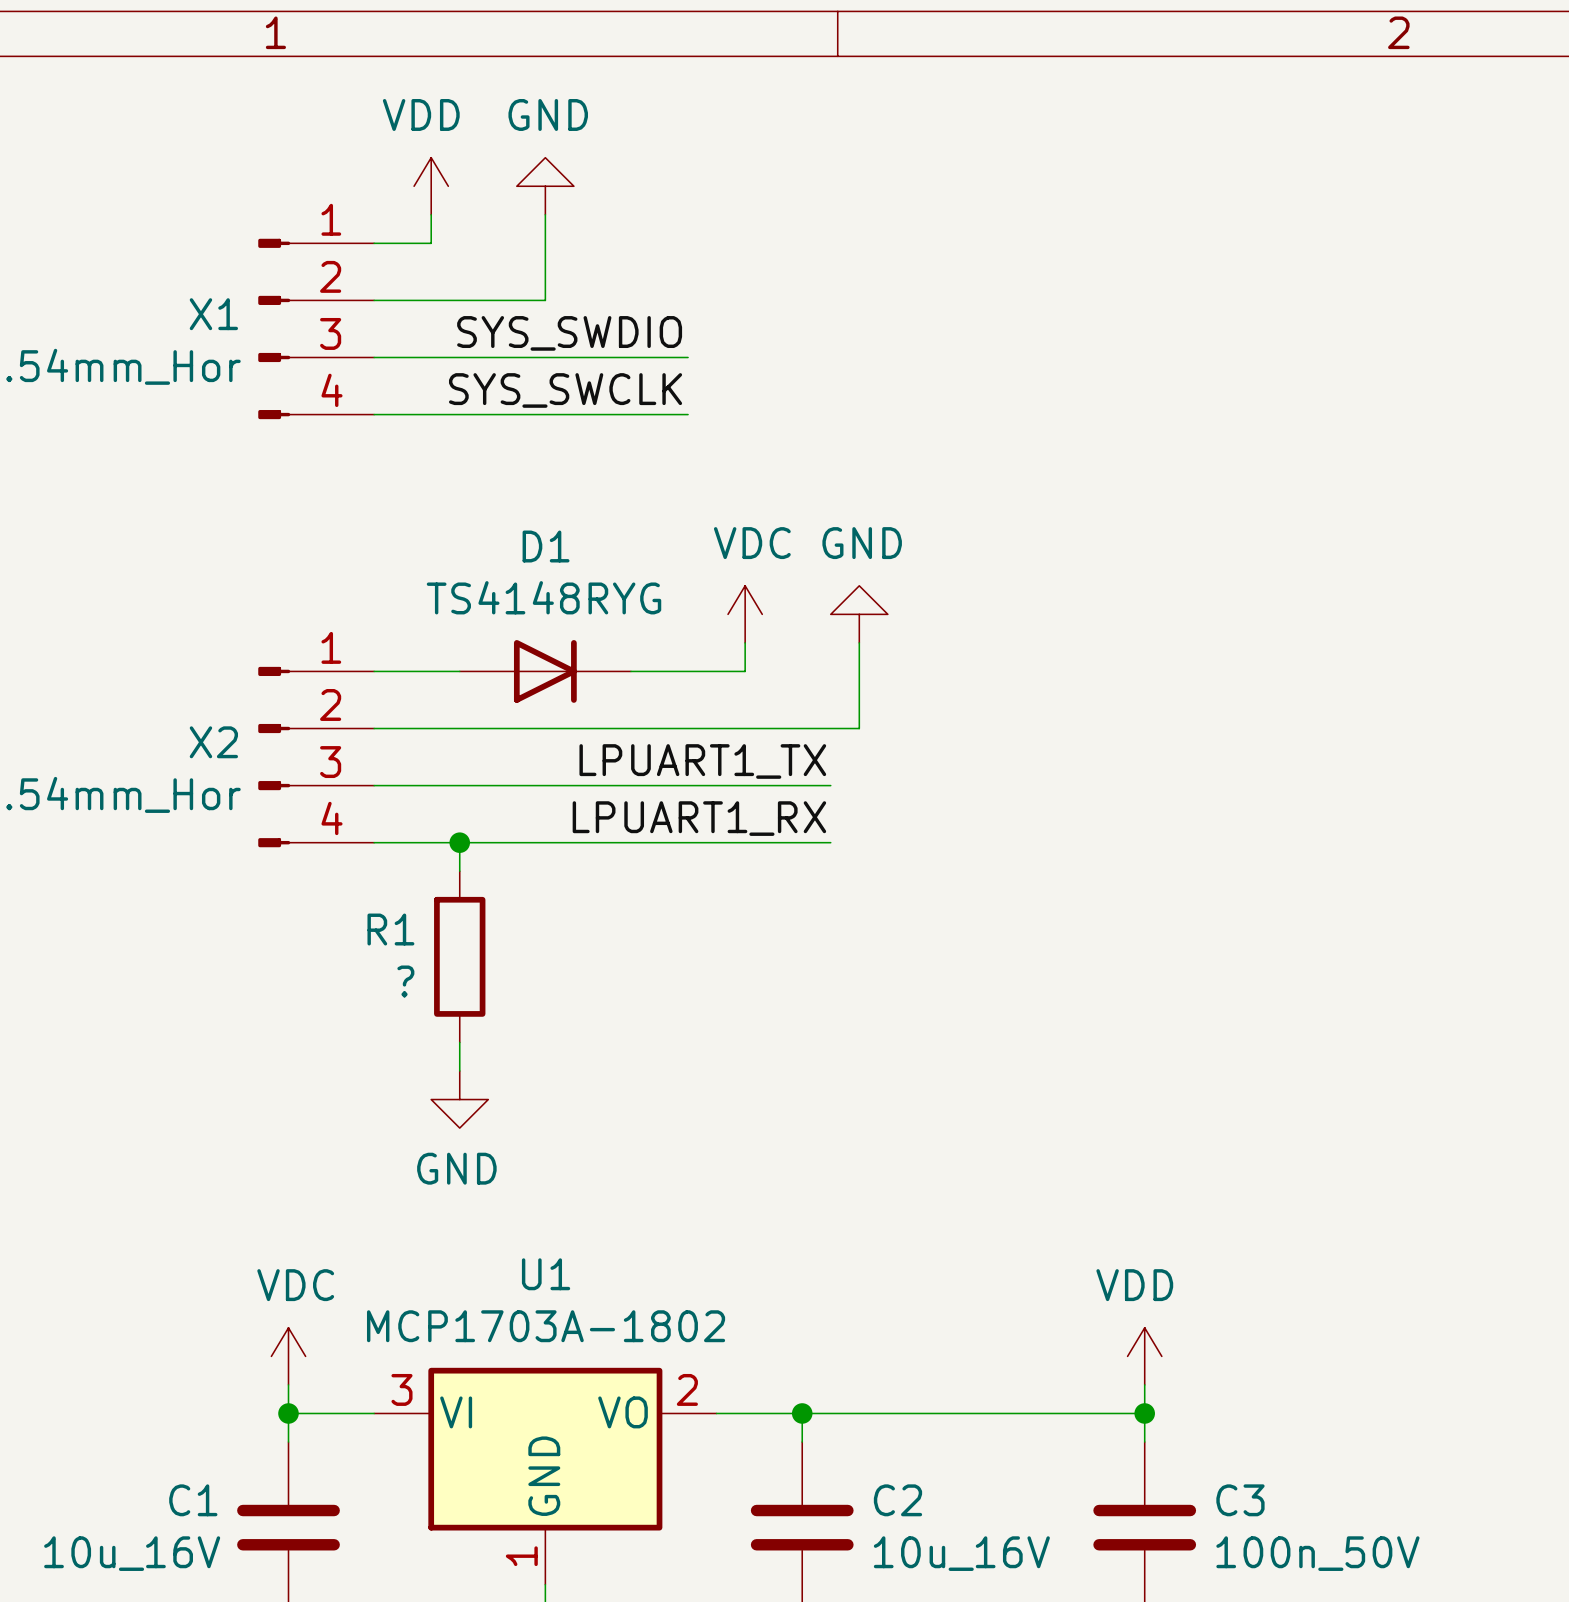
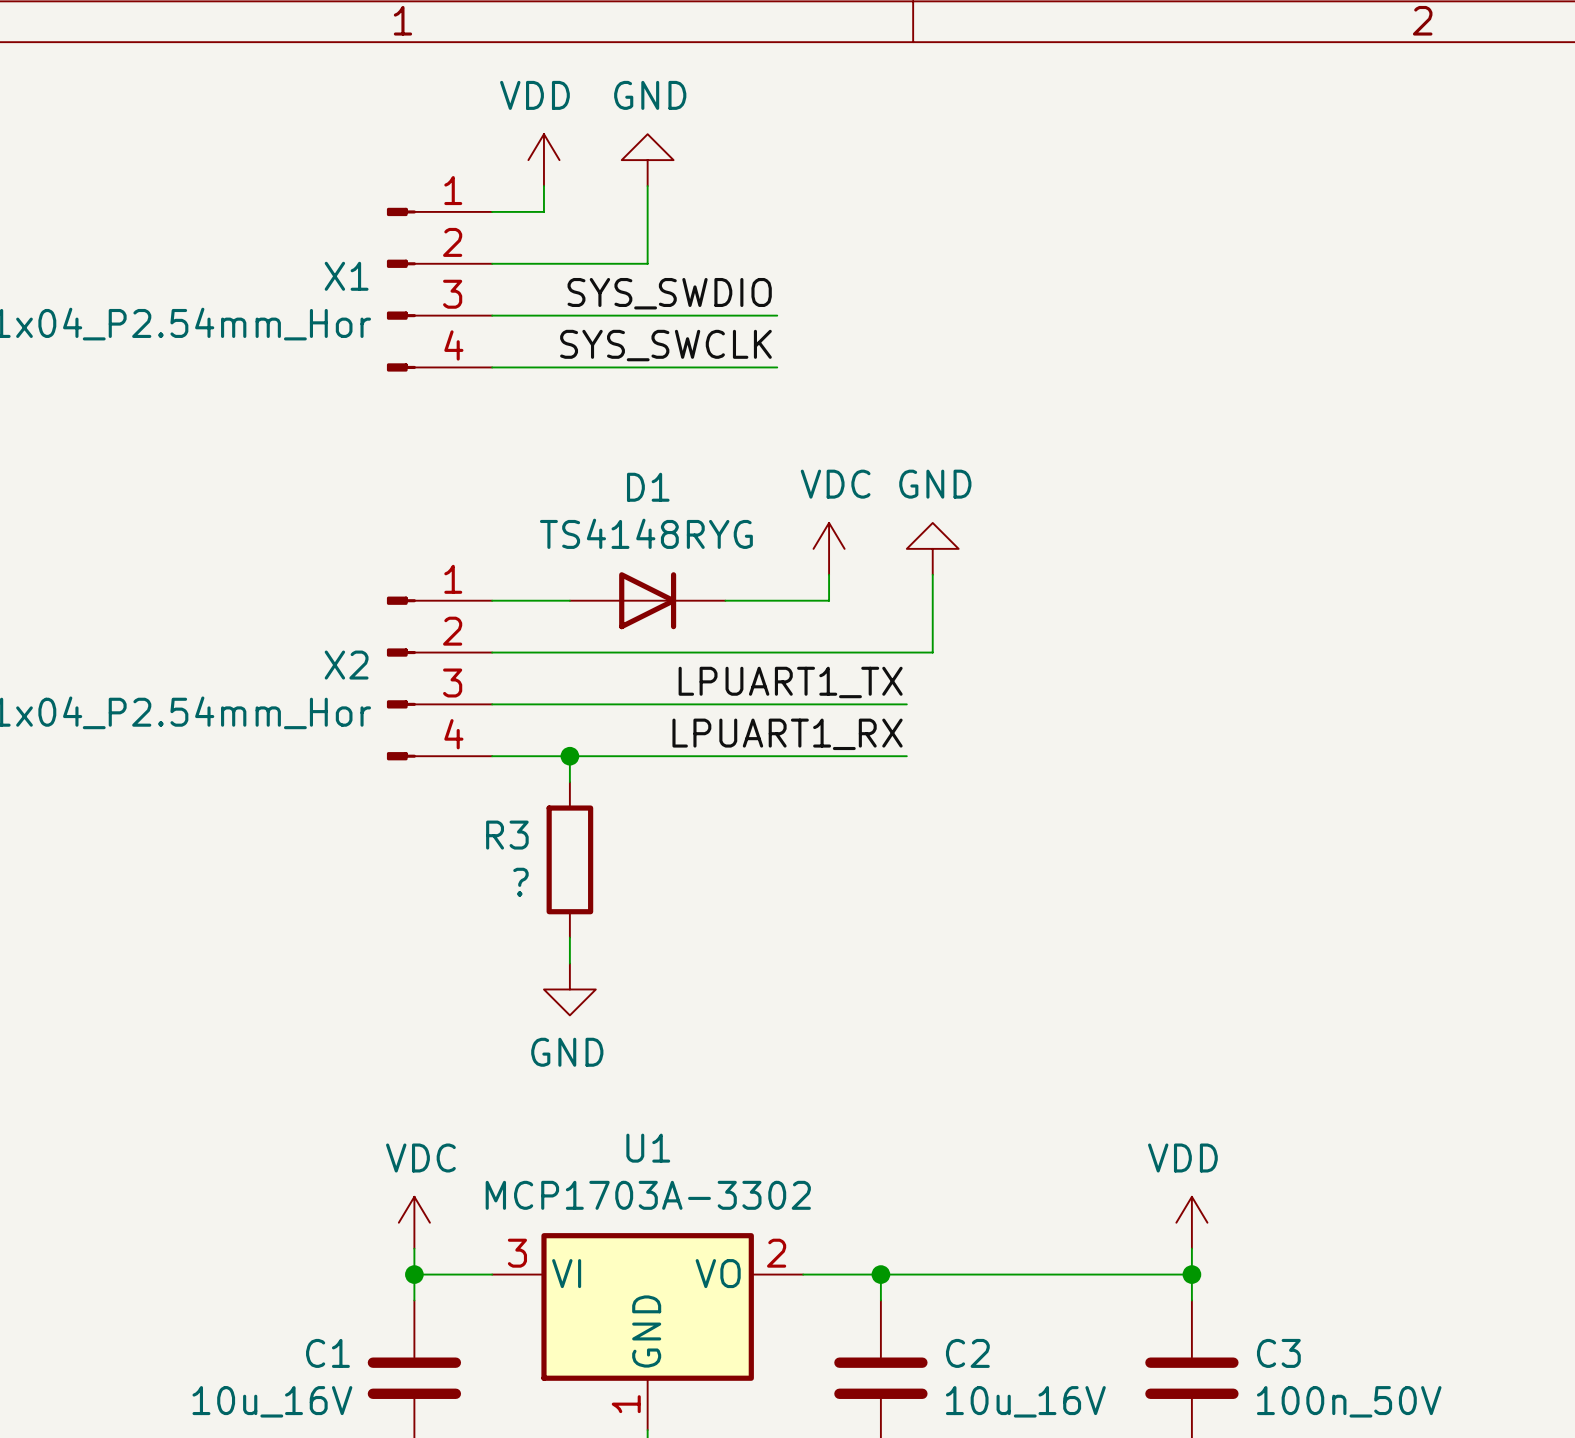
R1 name: R1 (390, 929) -> R3 (507, 835)
U1 value: MCP1703A-1802 (546, 1326) -> MCP1703A-3302 (648, 1195)

